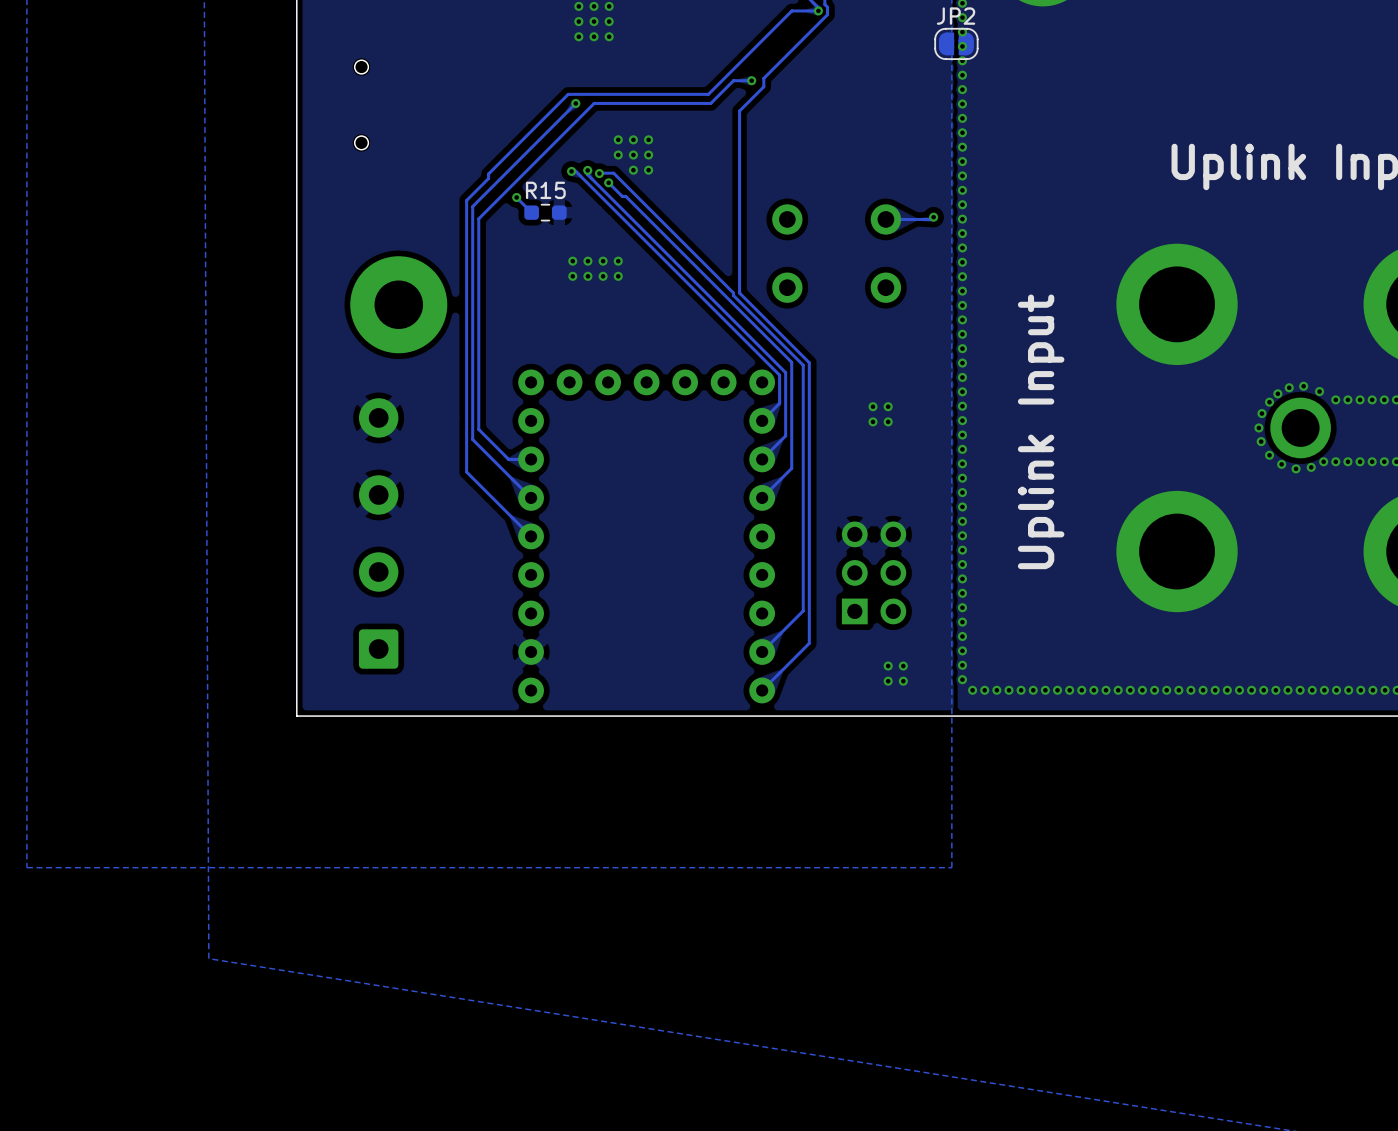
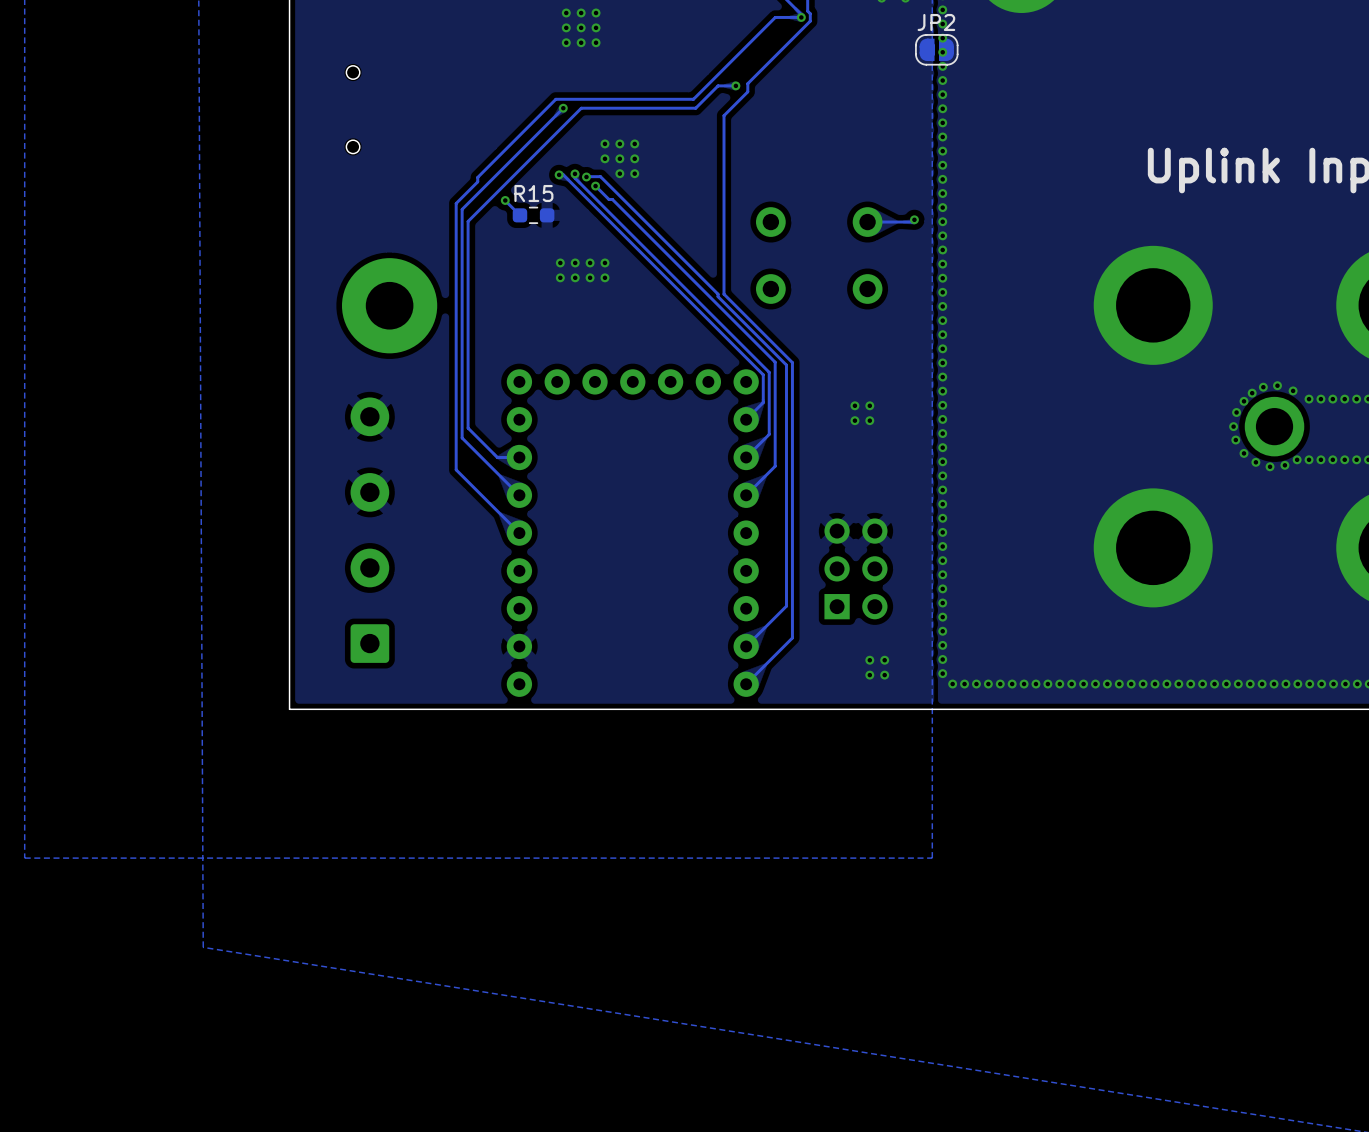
text: Uplink Input (1041, 431) -> none

